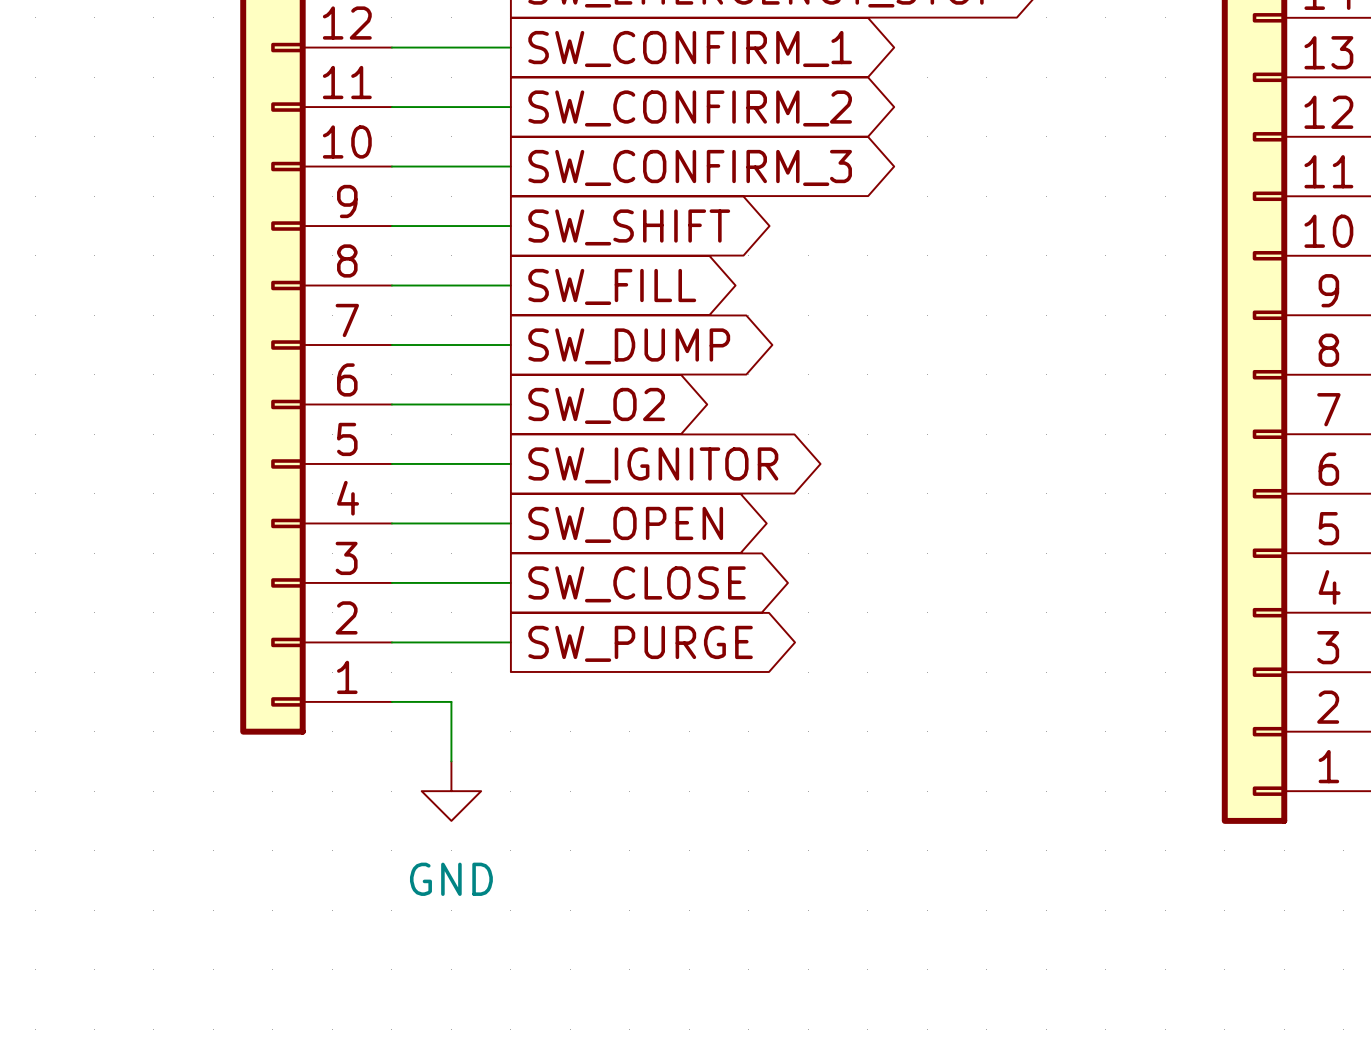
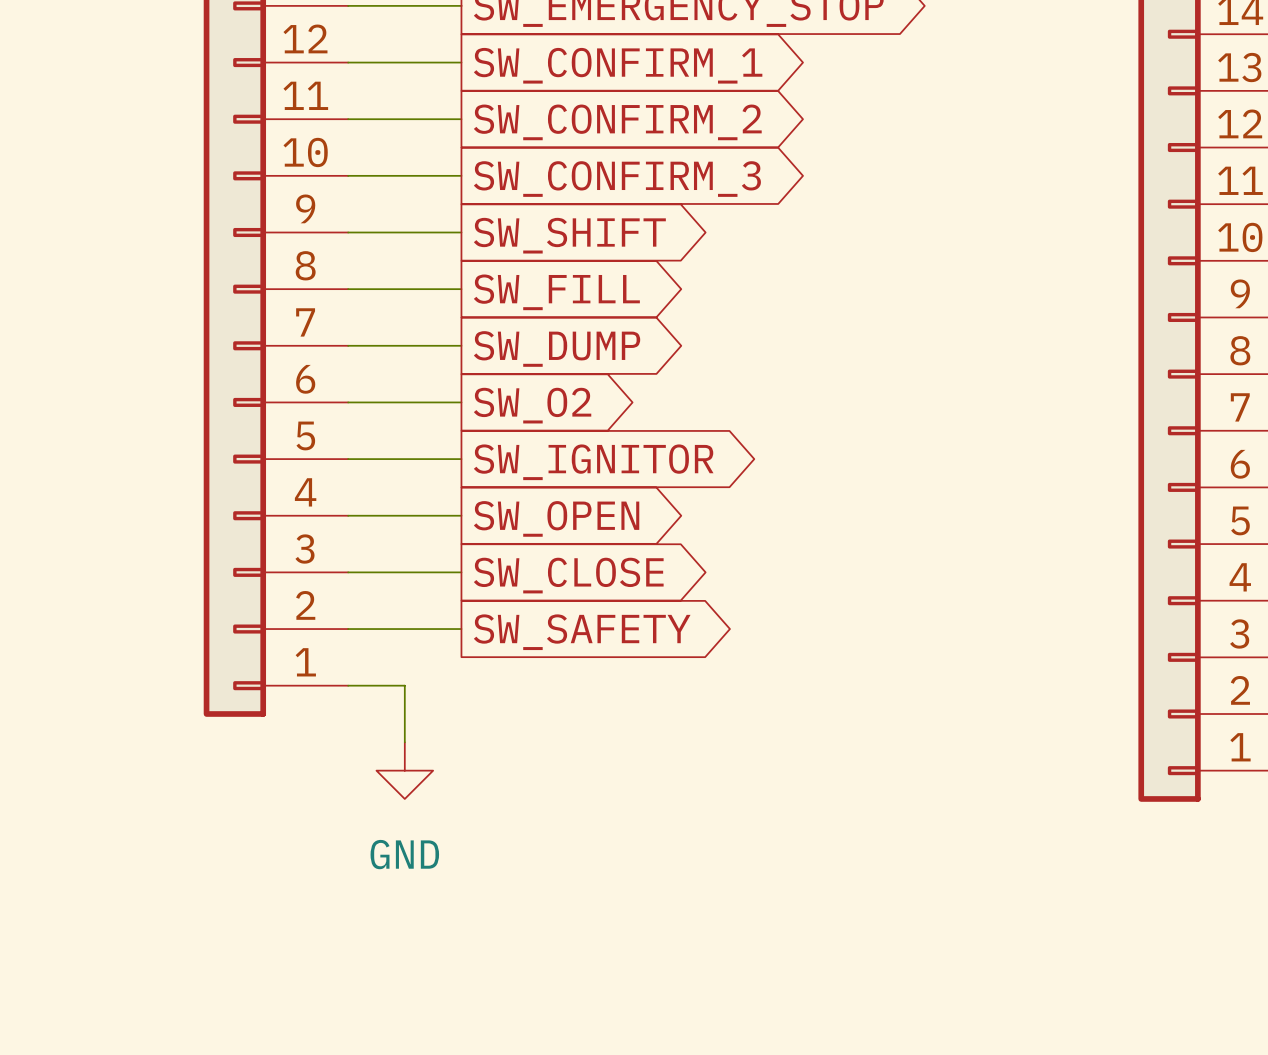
global label: SW_PURGE (640, 643) -> SW_SAFETY (582, 632)

